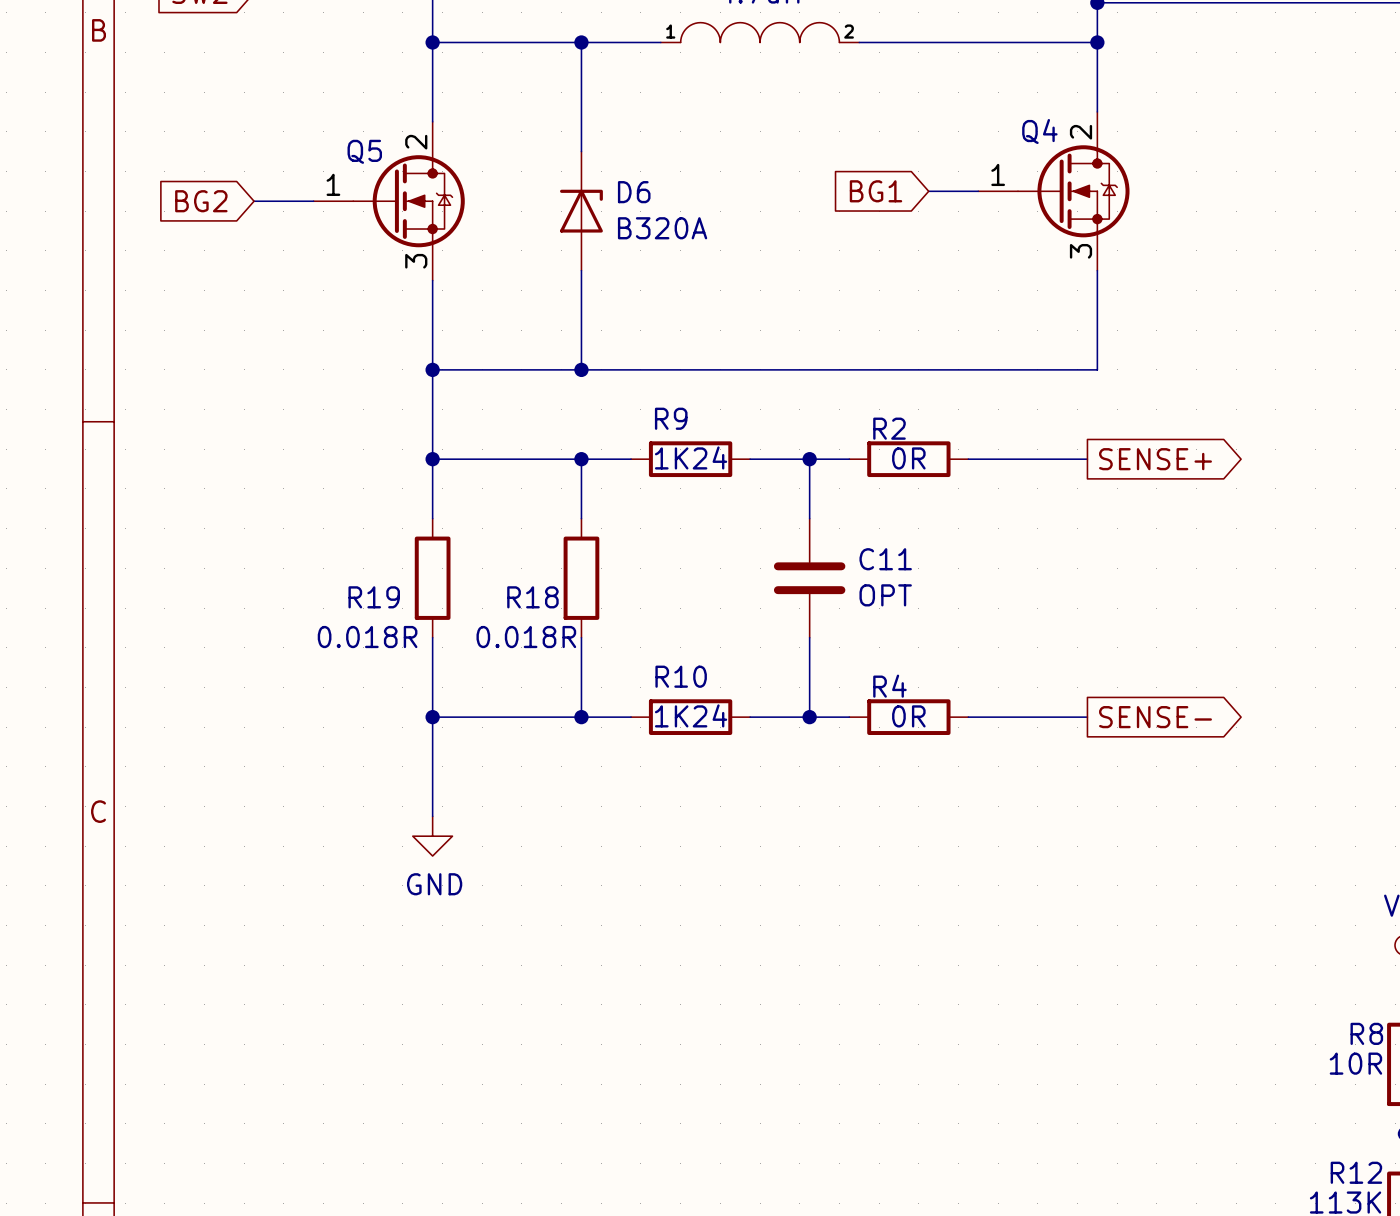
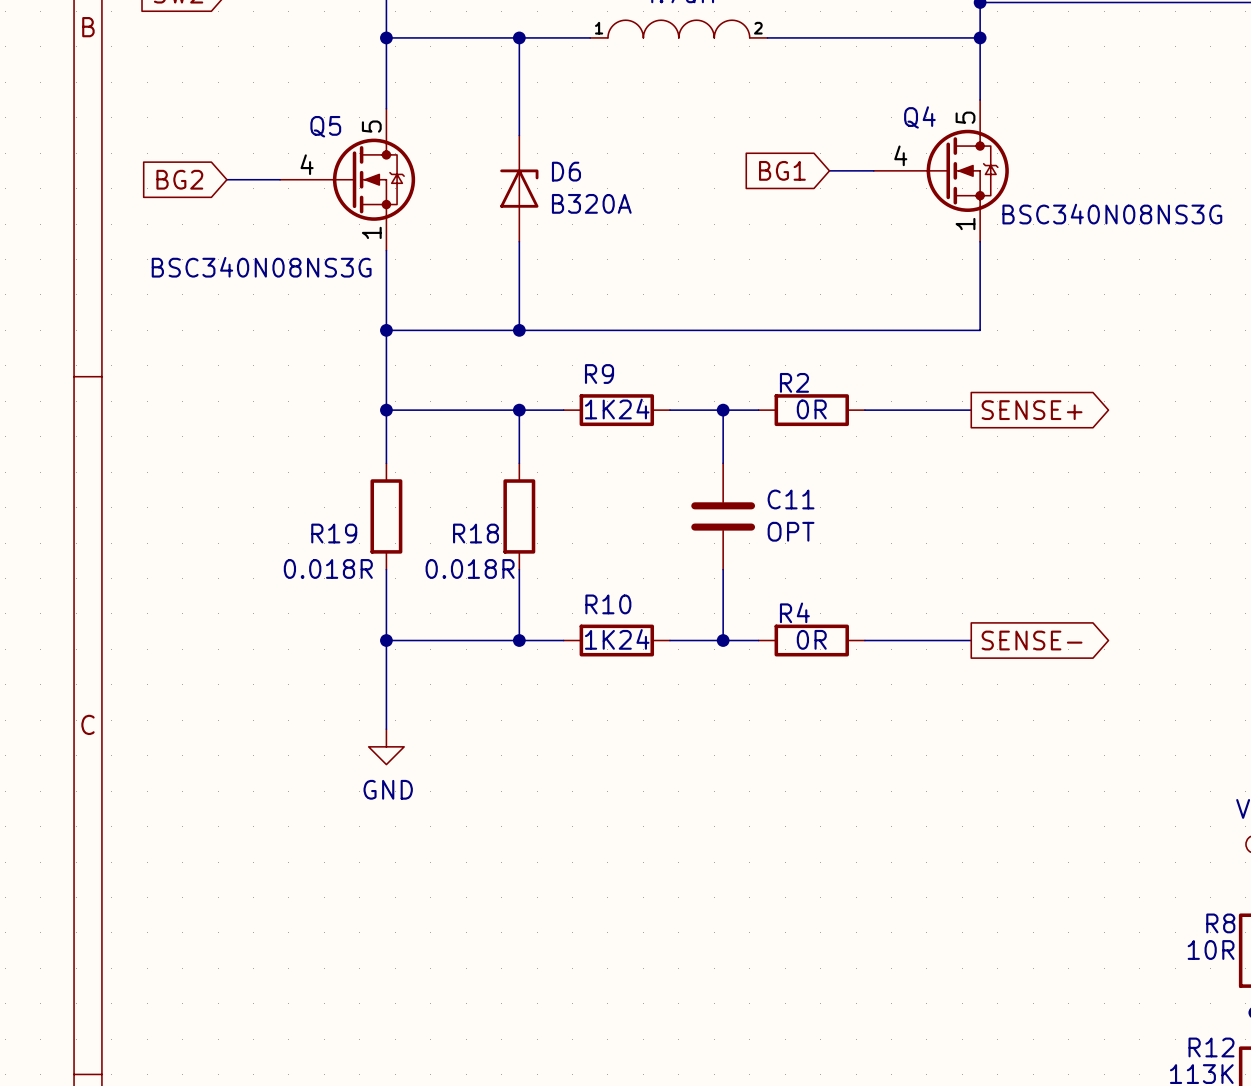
Q4 symbol: [978, 111, 1130, 271] -> [873, 99, 1009, 242]
Q5 symbol: [313, 121, 465, 281] -> [280, 108, 416, 251]
Q4 value: none -> BSC340N08NS3G (1112, 214)
Q5 value: none -> BSC340N08NS3G (261, 267)

